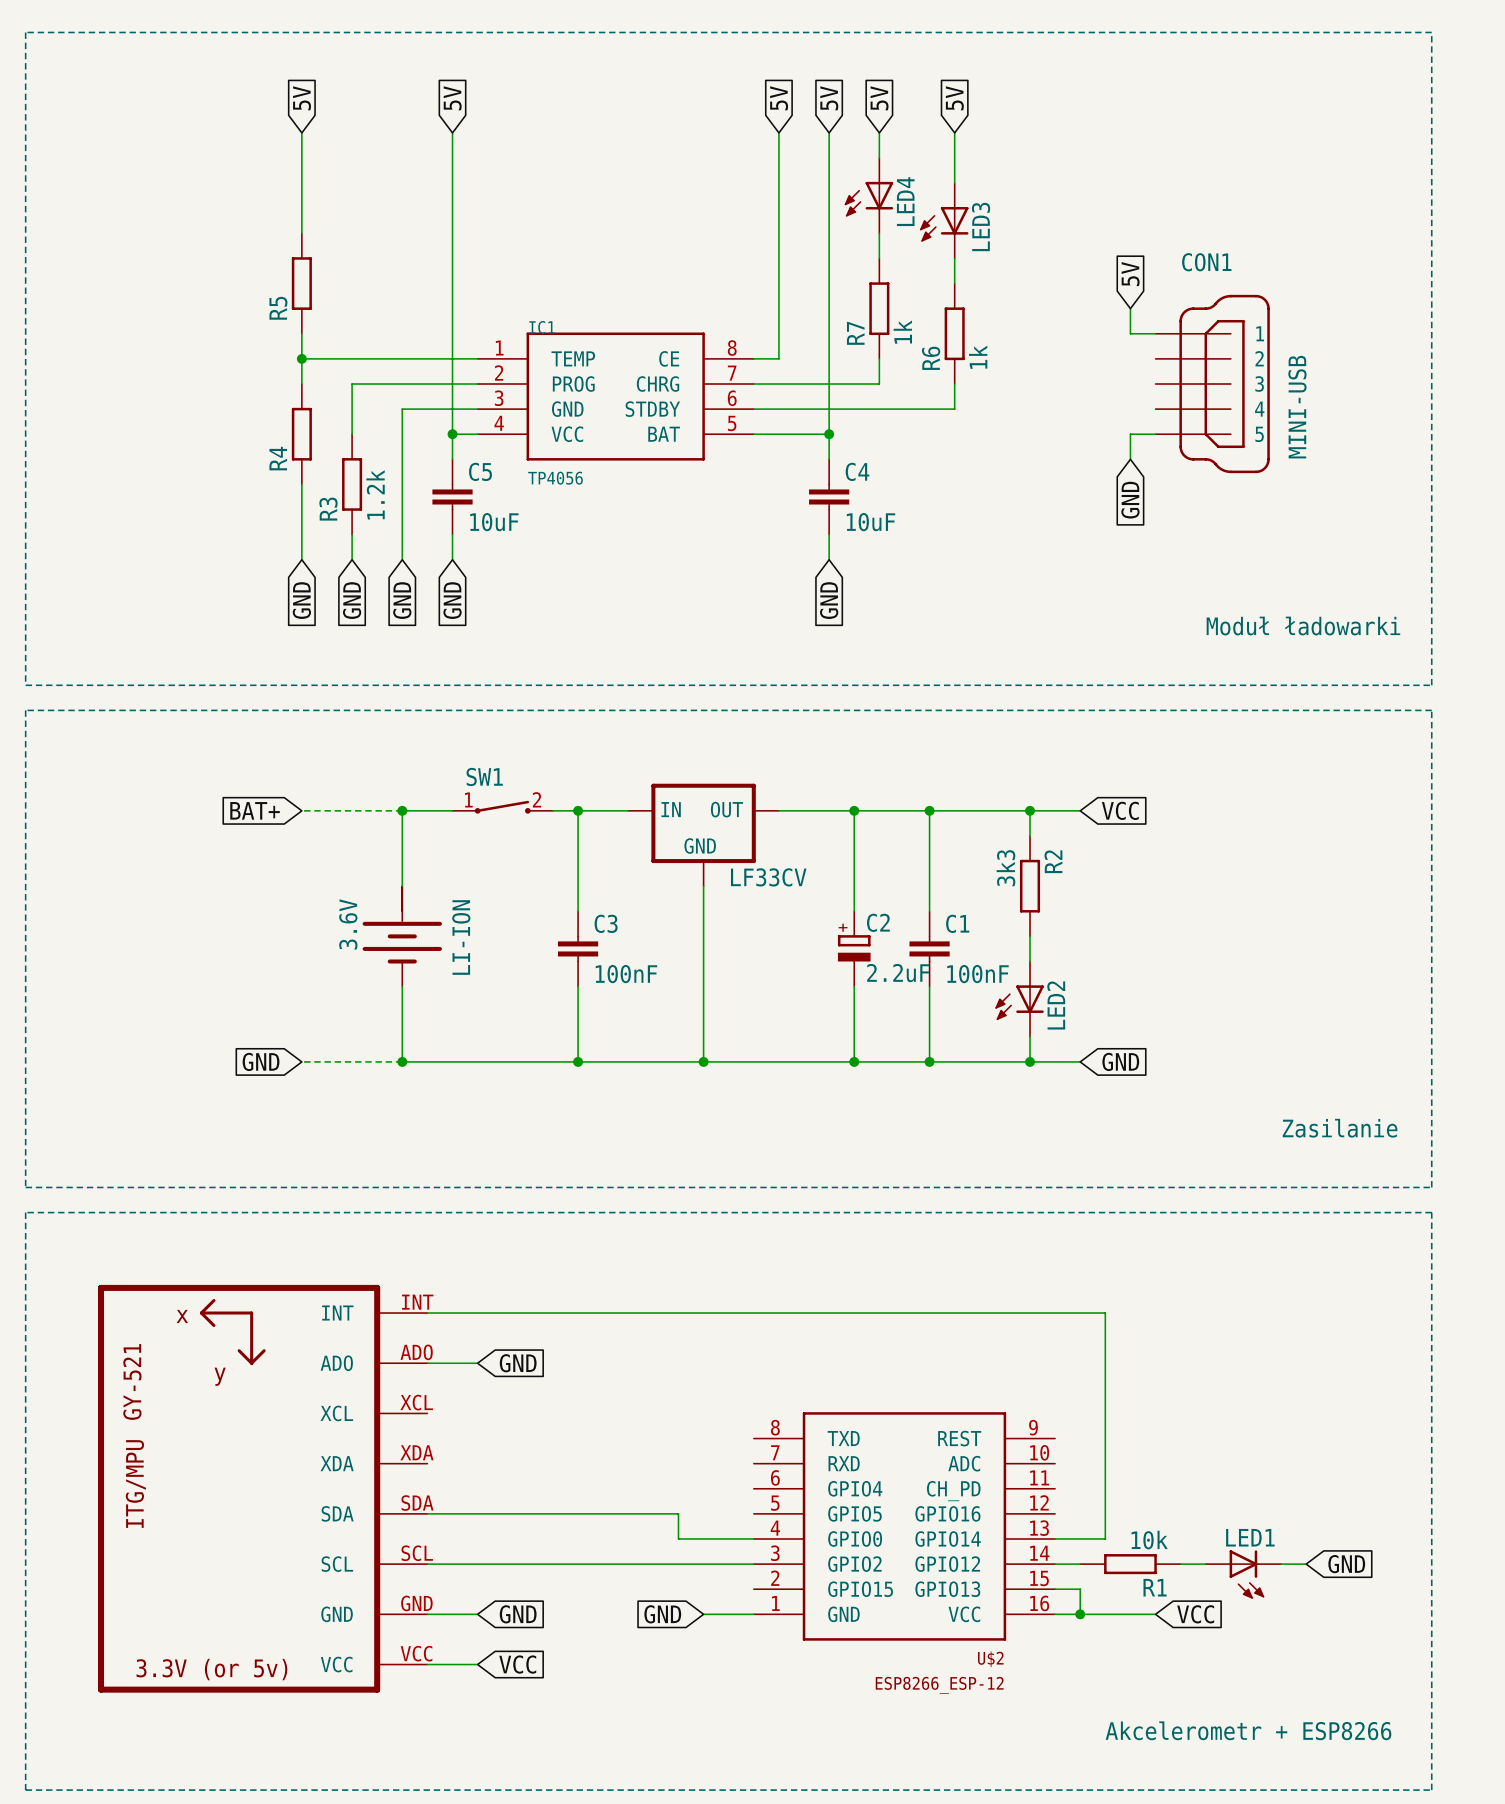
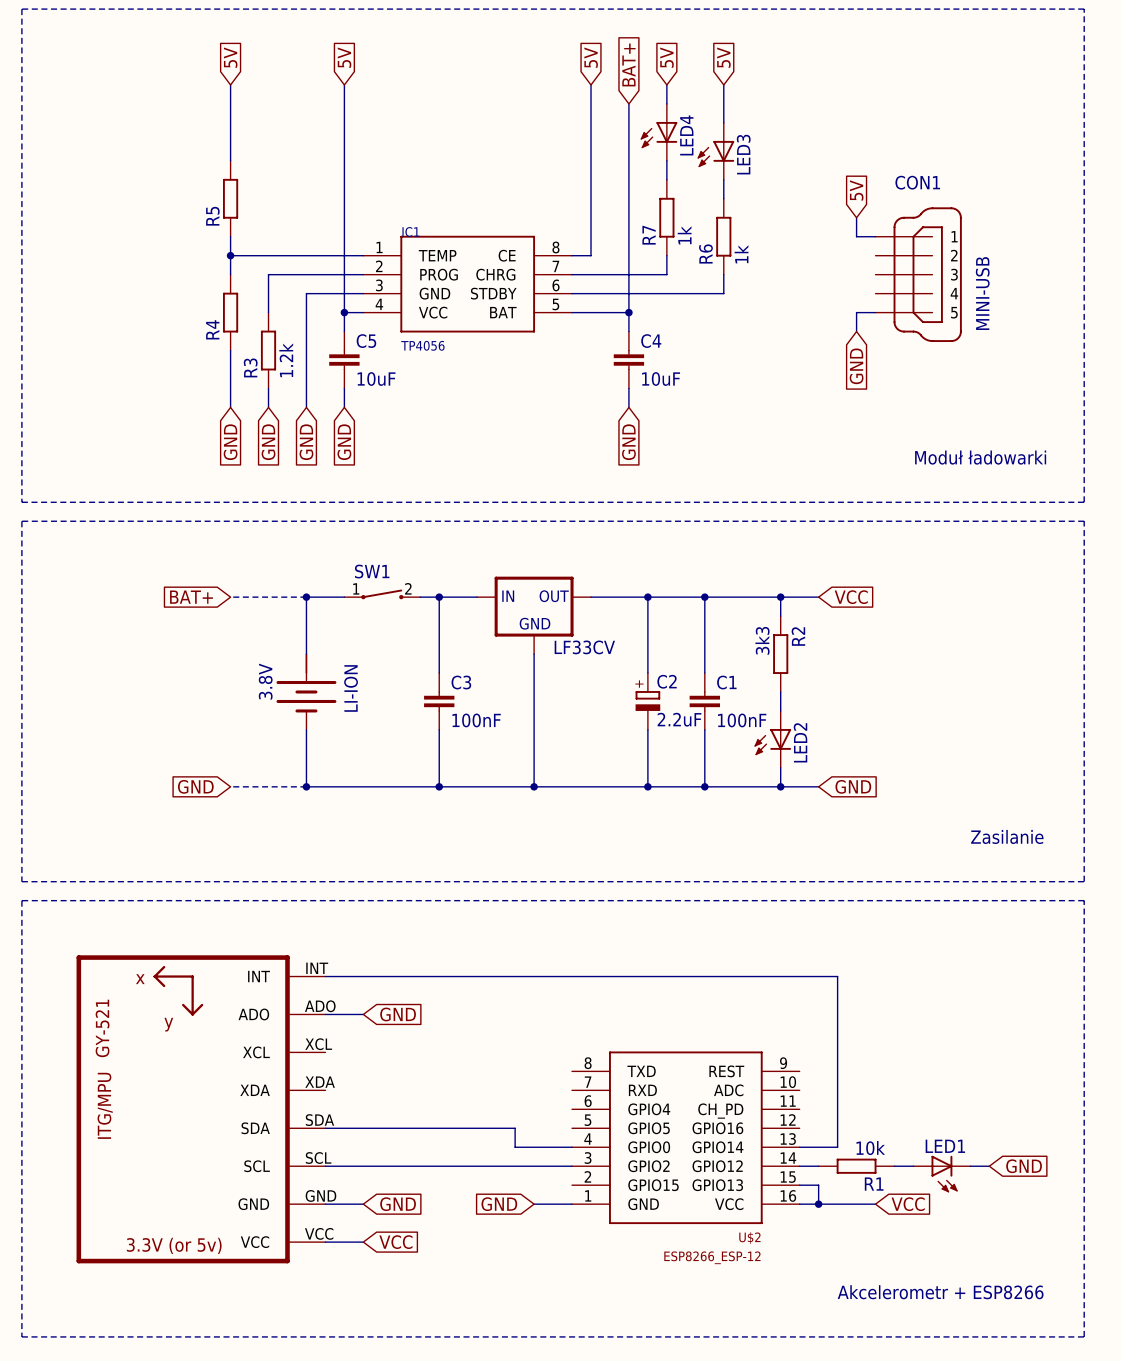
global label: 5V (829, 98) -> none
global label: none -> BAT+ (628, 64)
wire: (829, 132) (829, 158) -> none
LI-ION value: 3.6V (348, 924) -> 3.8V (265, 681)

